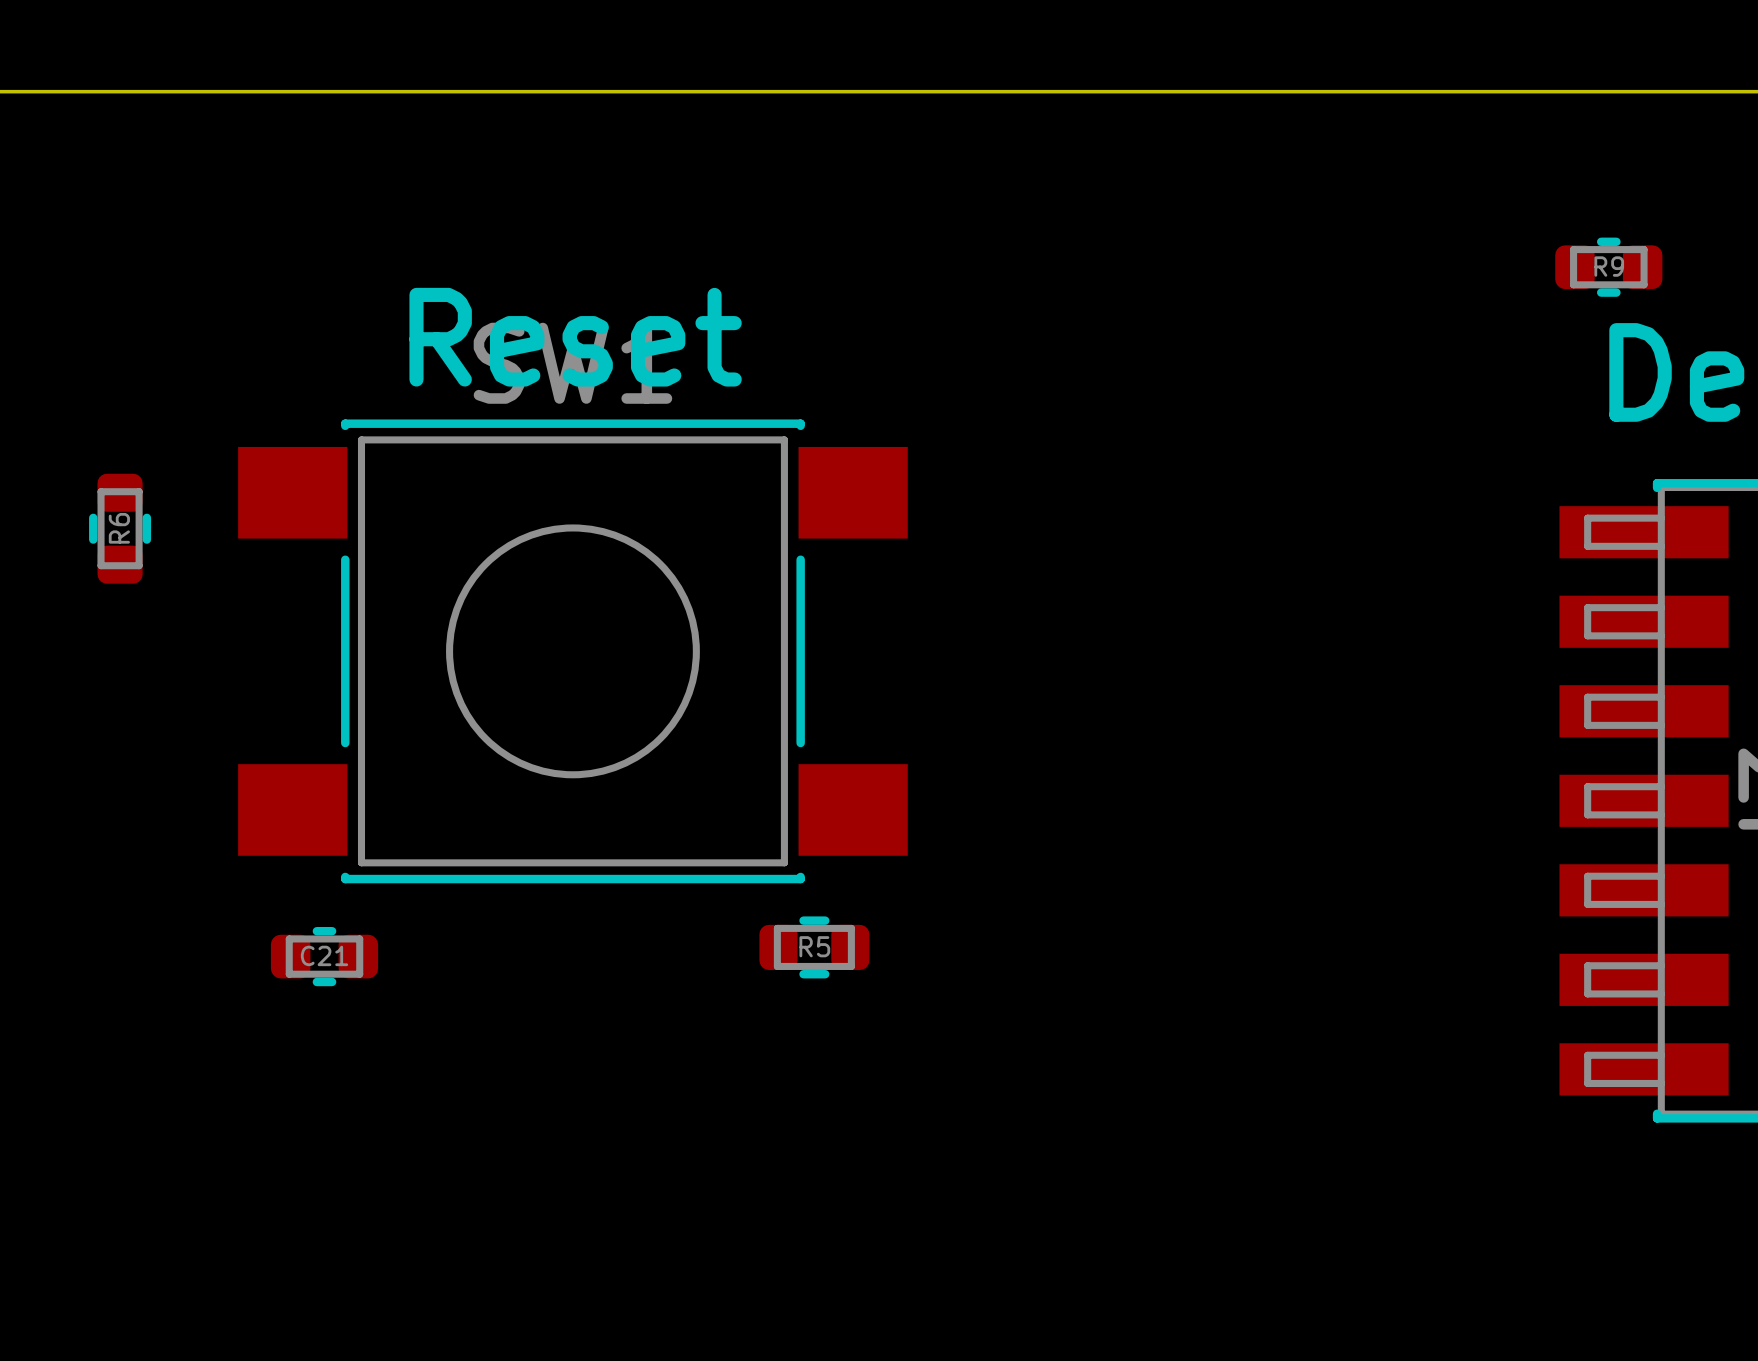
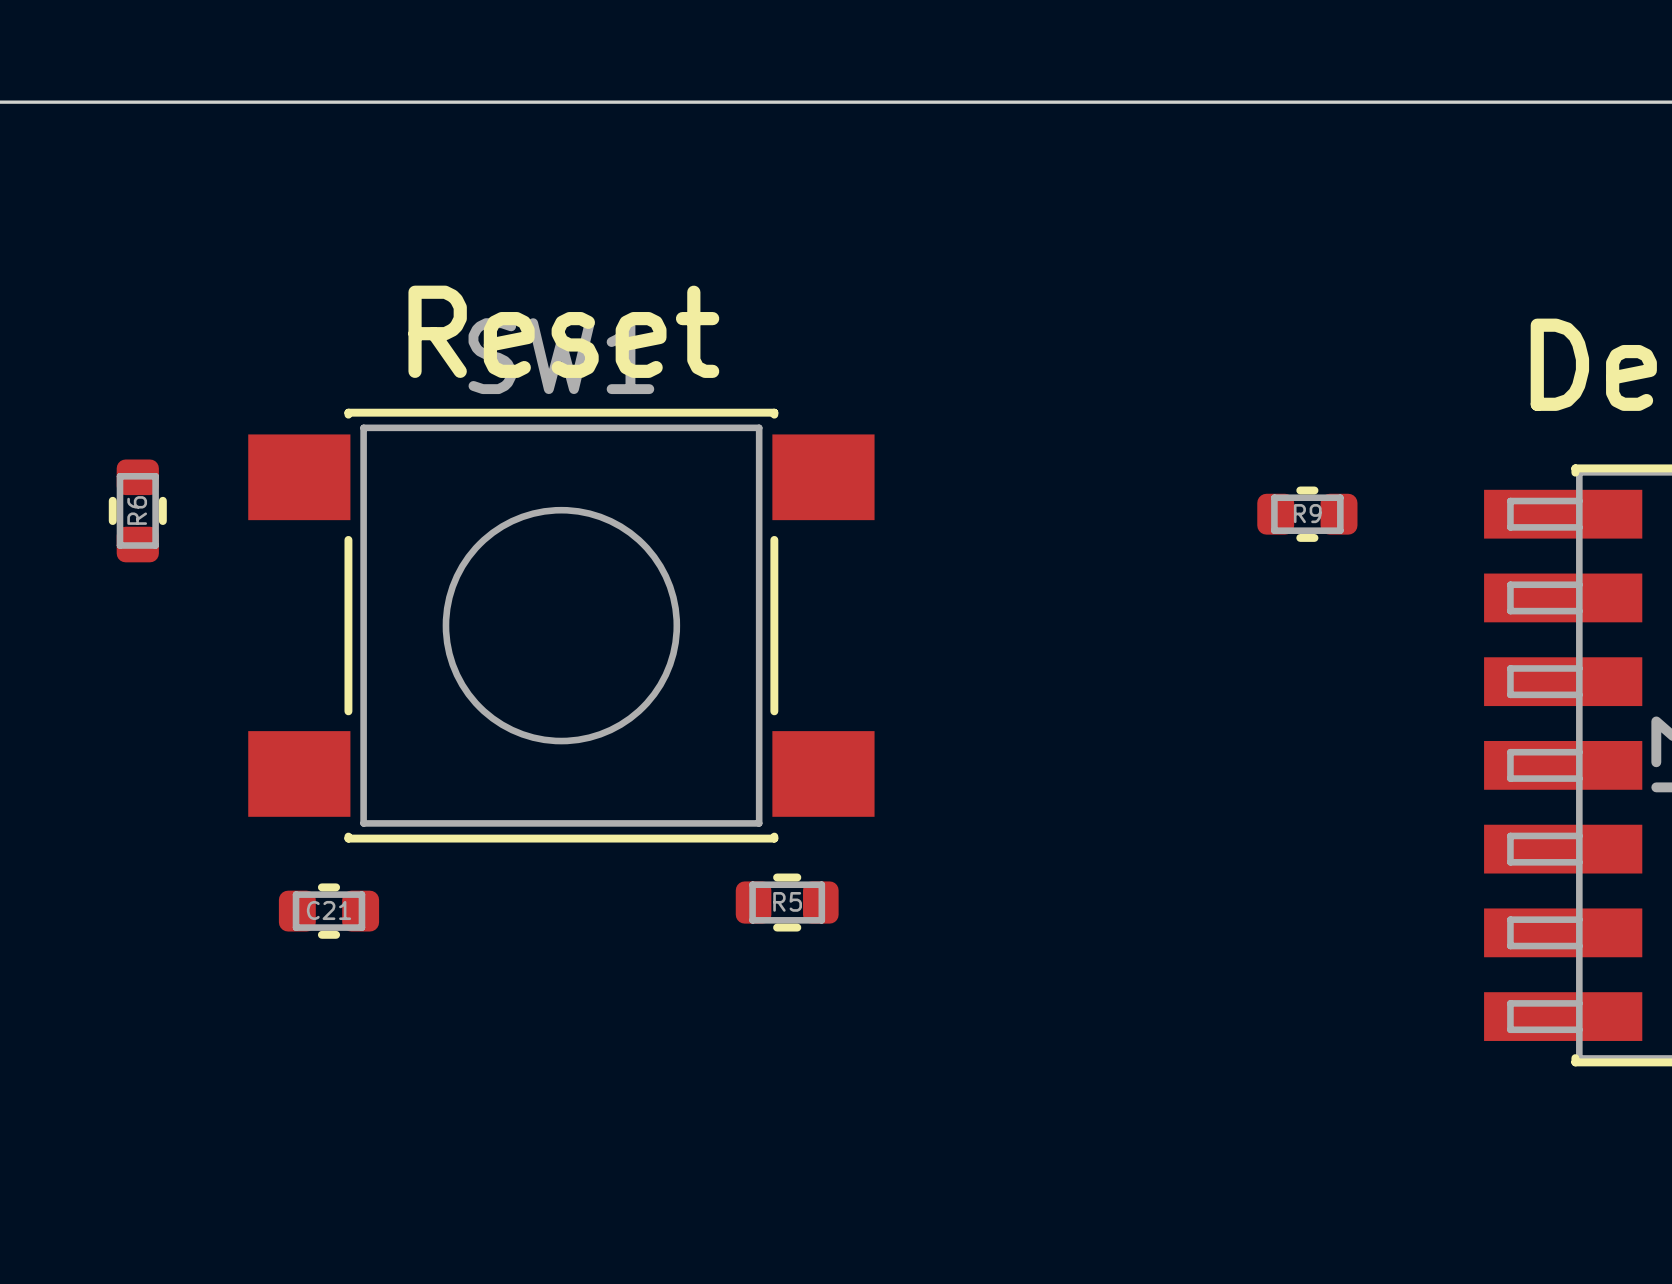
R9 position: (1608, 267) -> (1307, 514)

